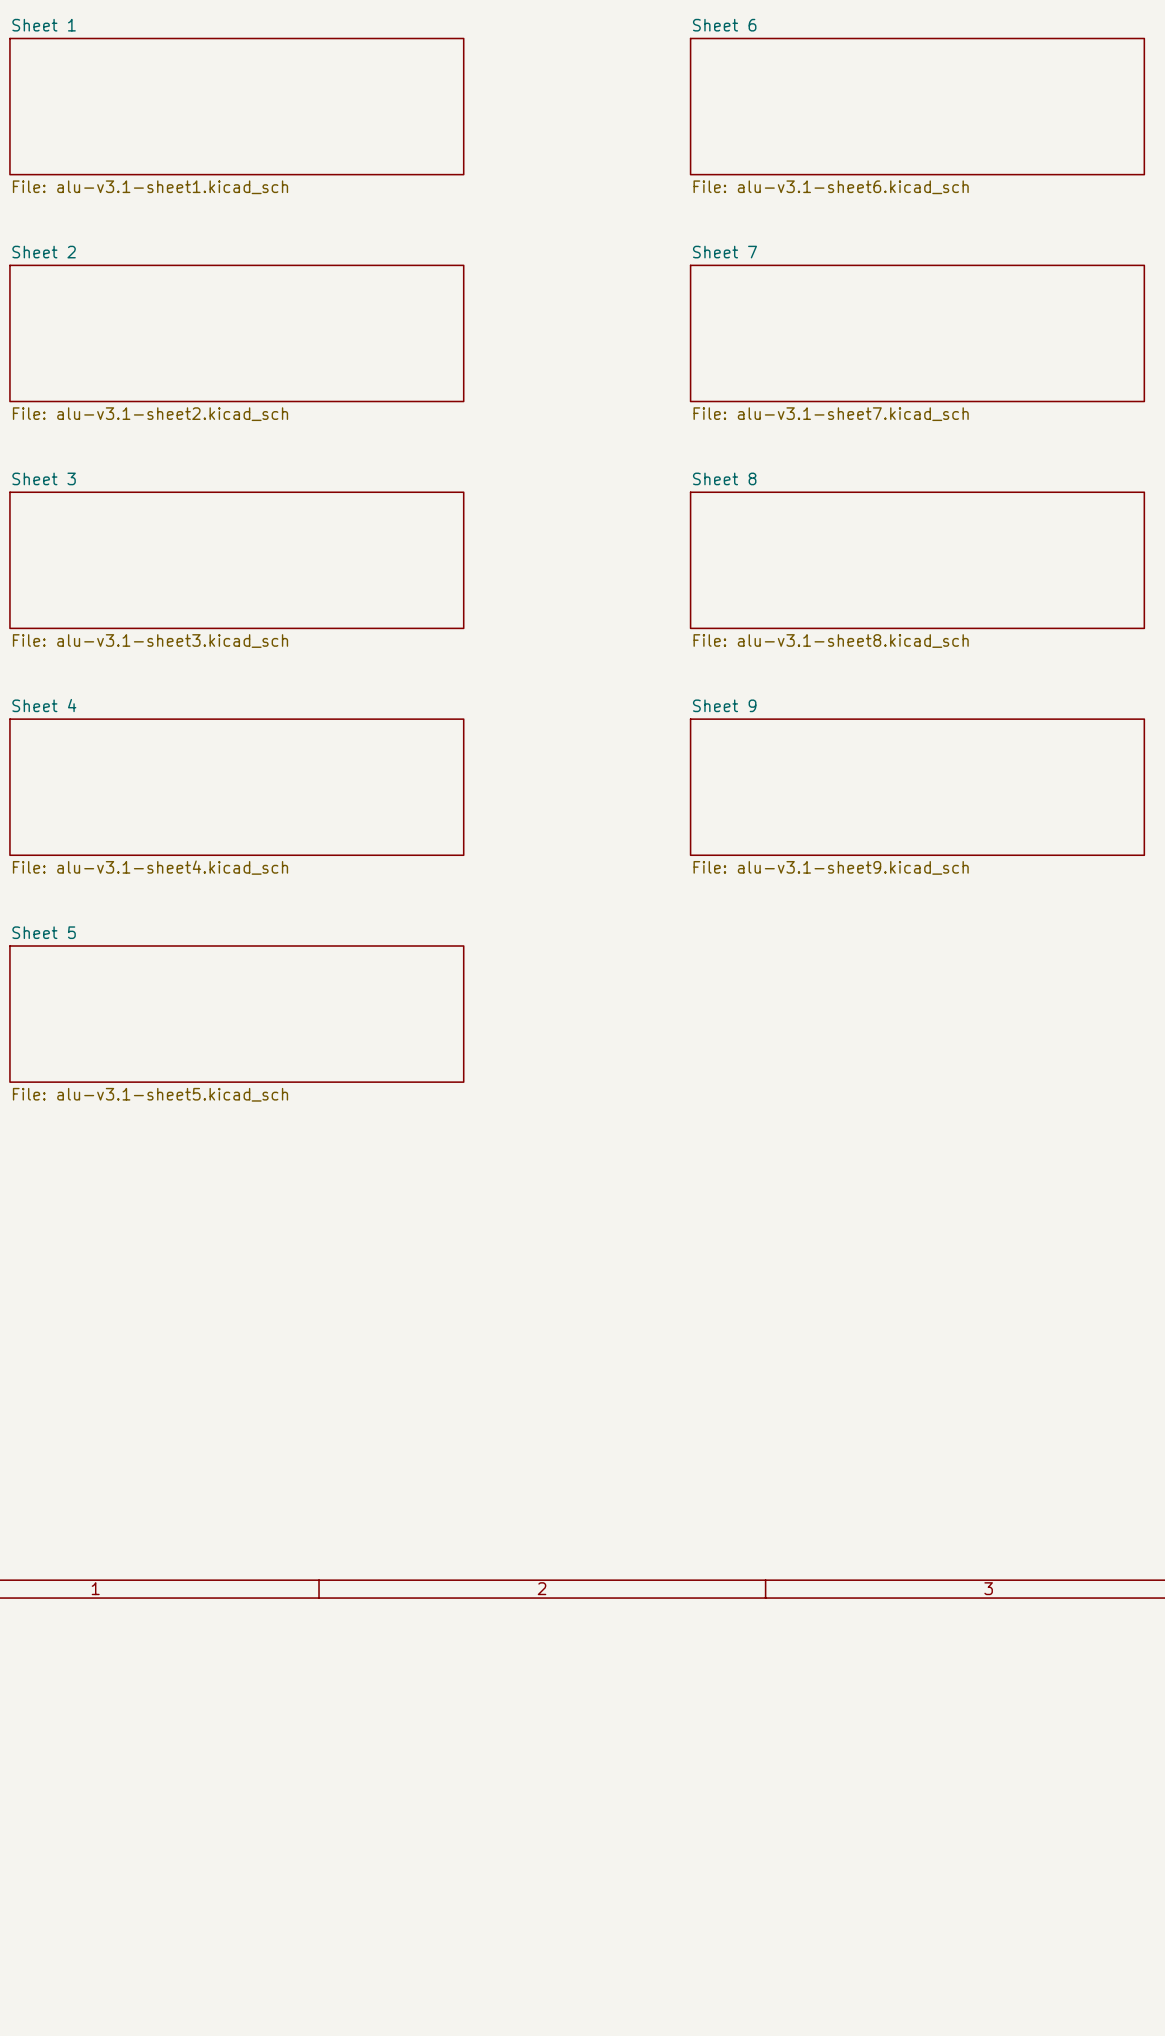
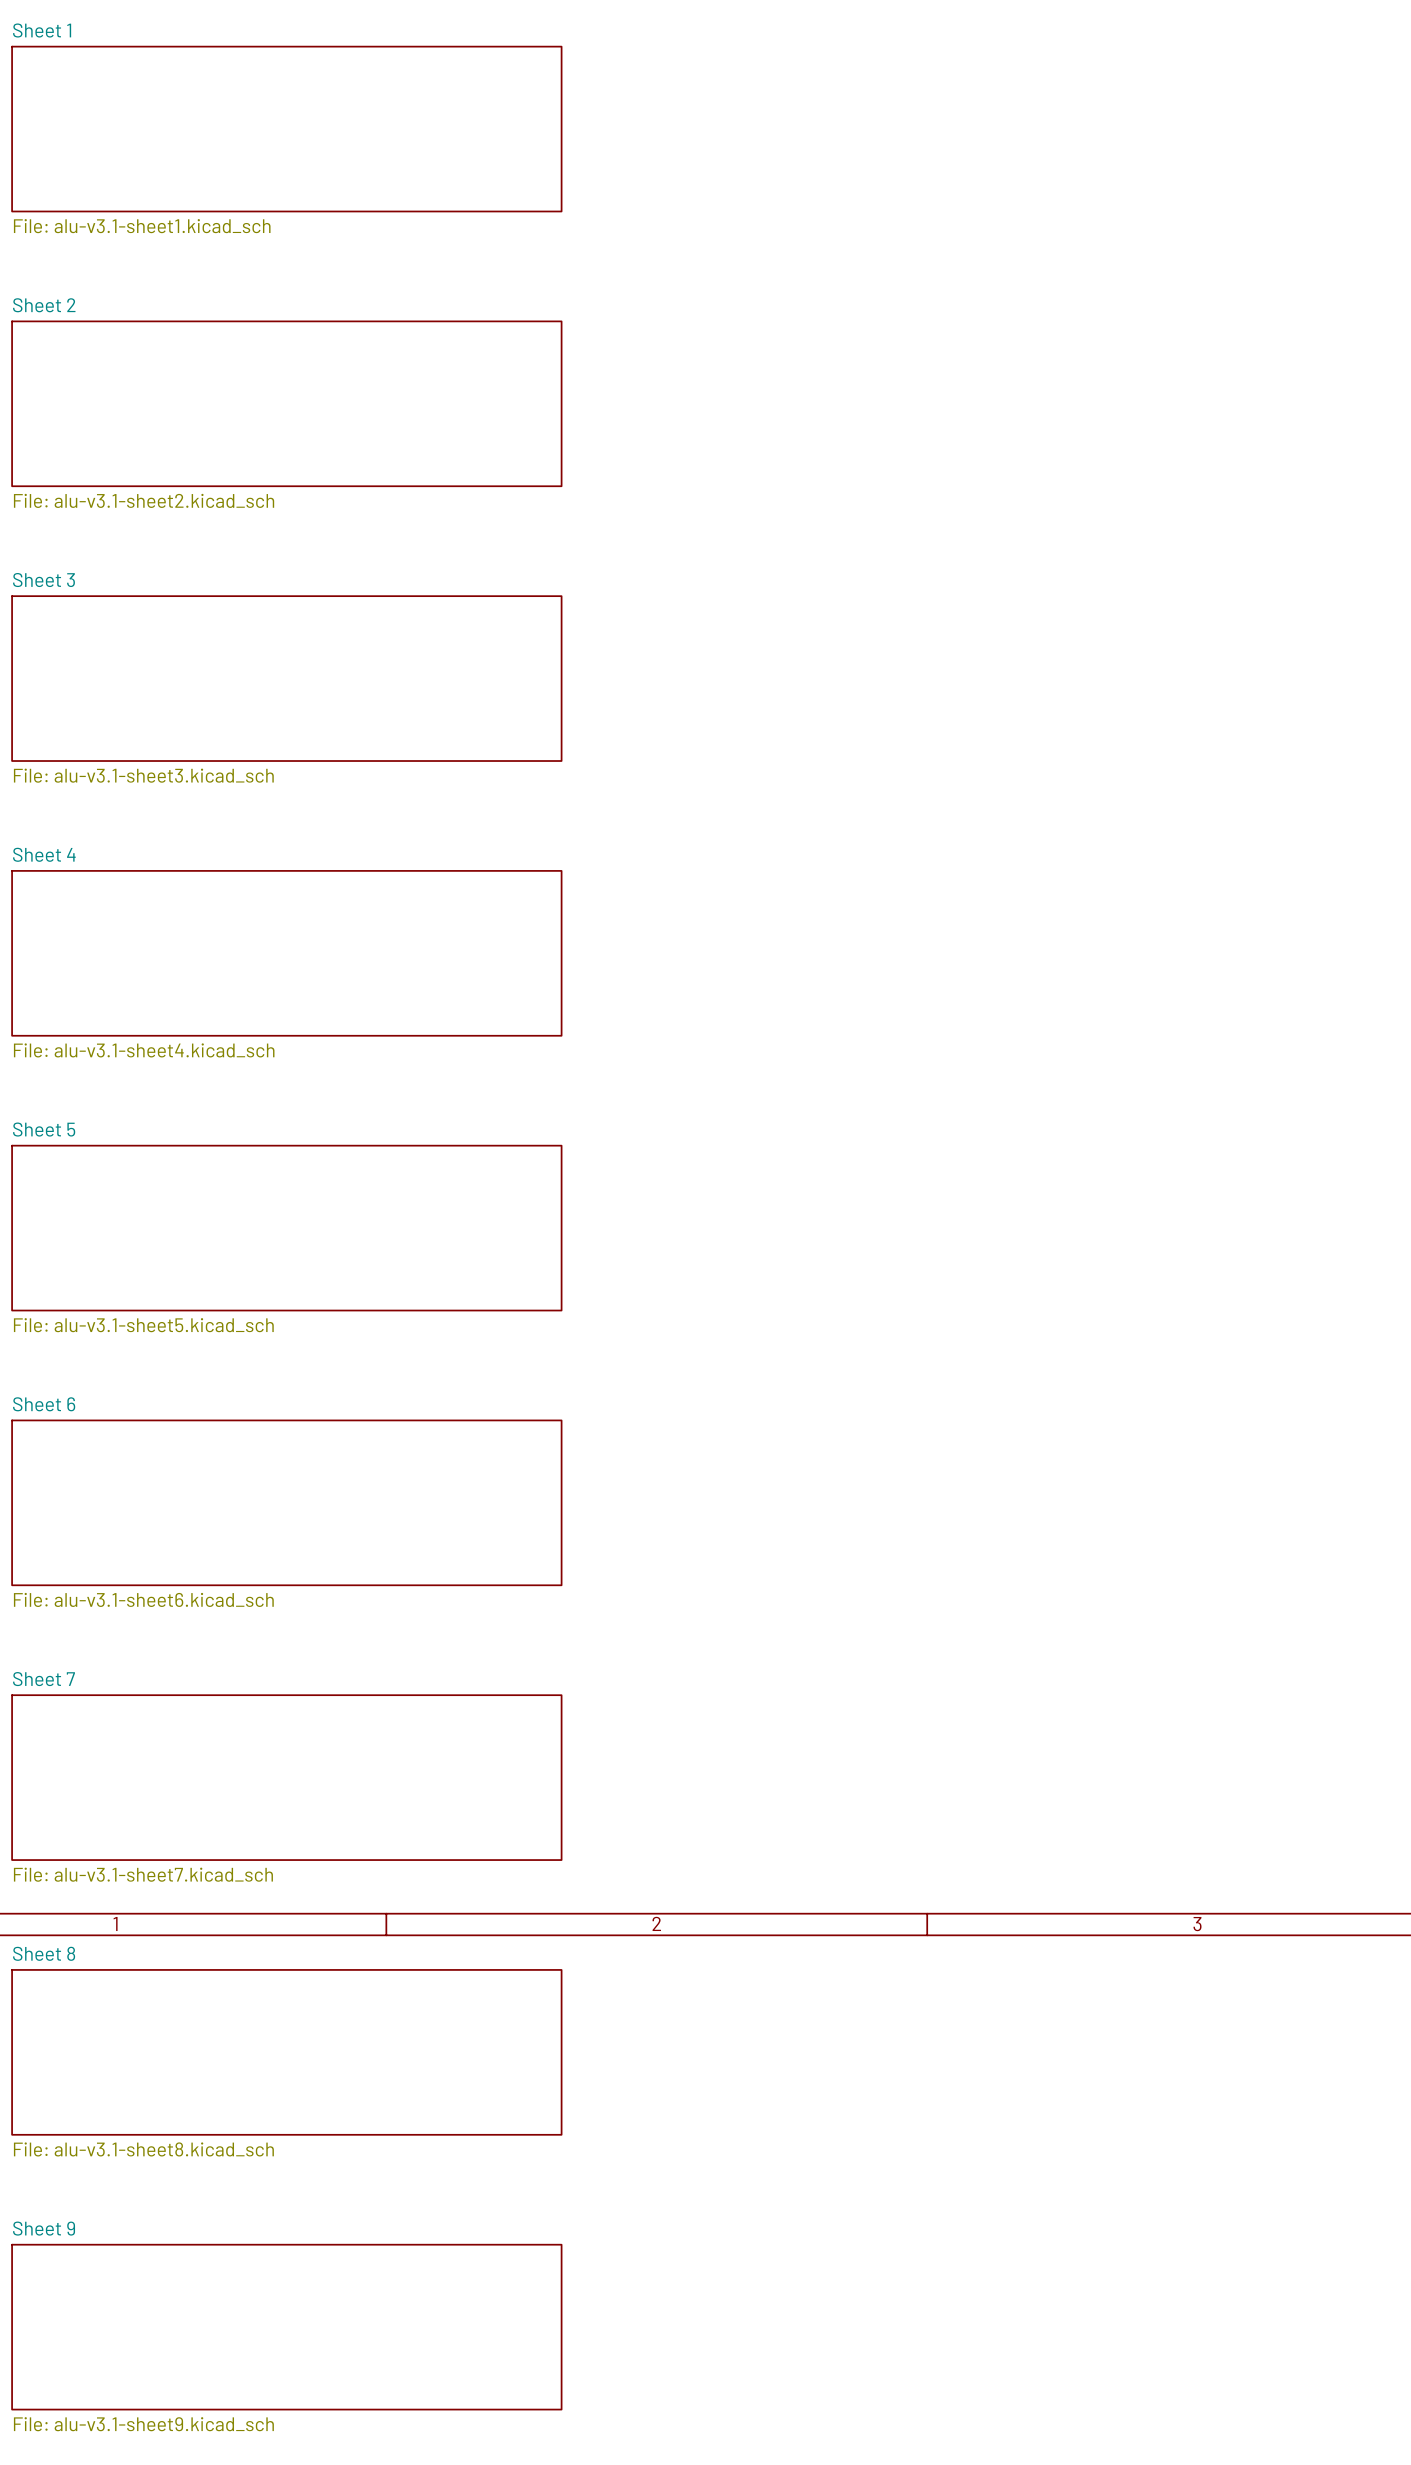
sheet Sheet 6 position: (917, 106) -> (286, 1502)
sheet Sheet 7 position: (917, 333) -> (286, 1777)
sheet Sheet 8 position: (917, 560) -> (286, 2052)
sheet Sheet 9 position: (917, 787) -> (286, 2327)

